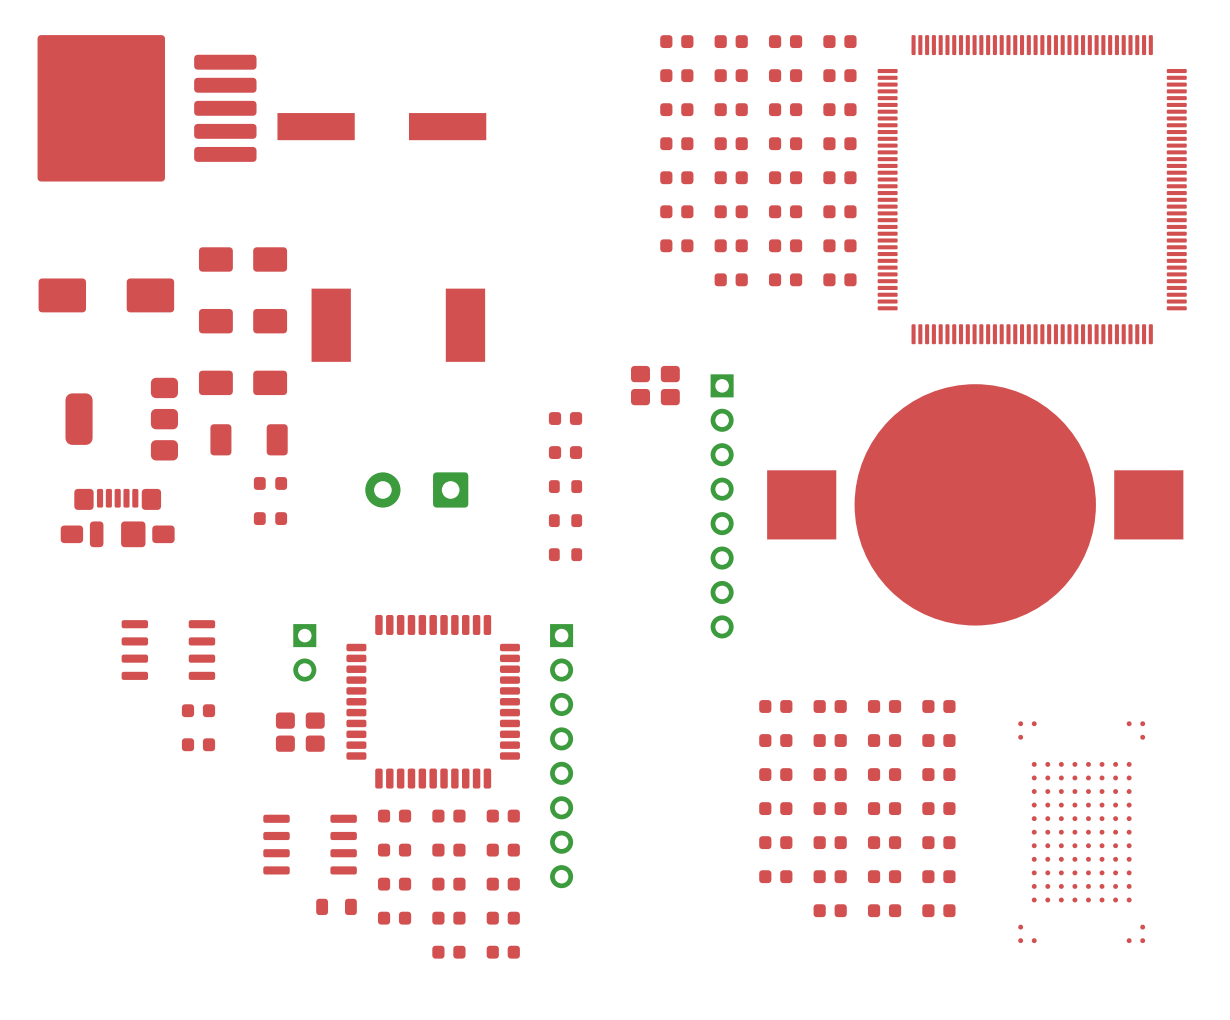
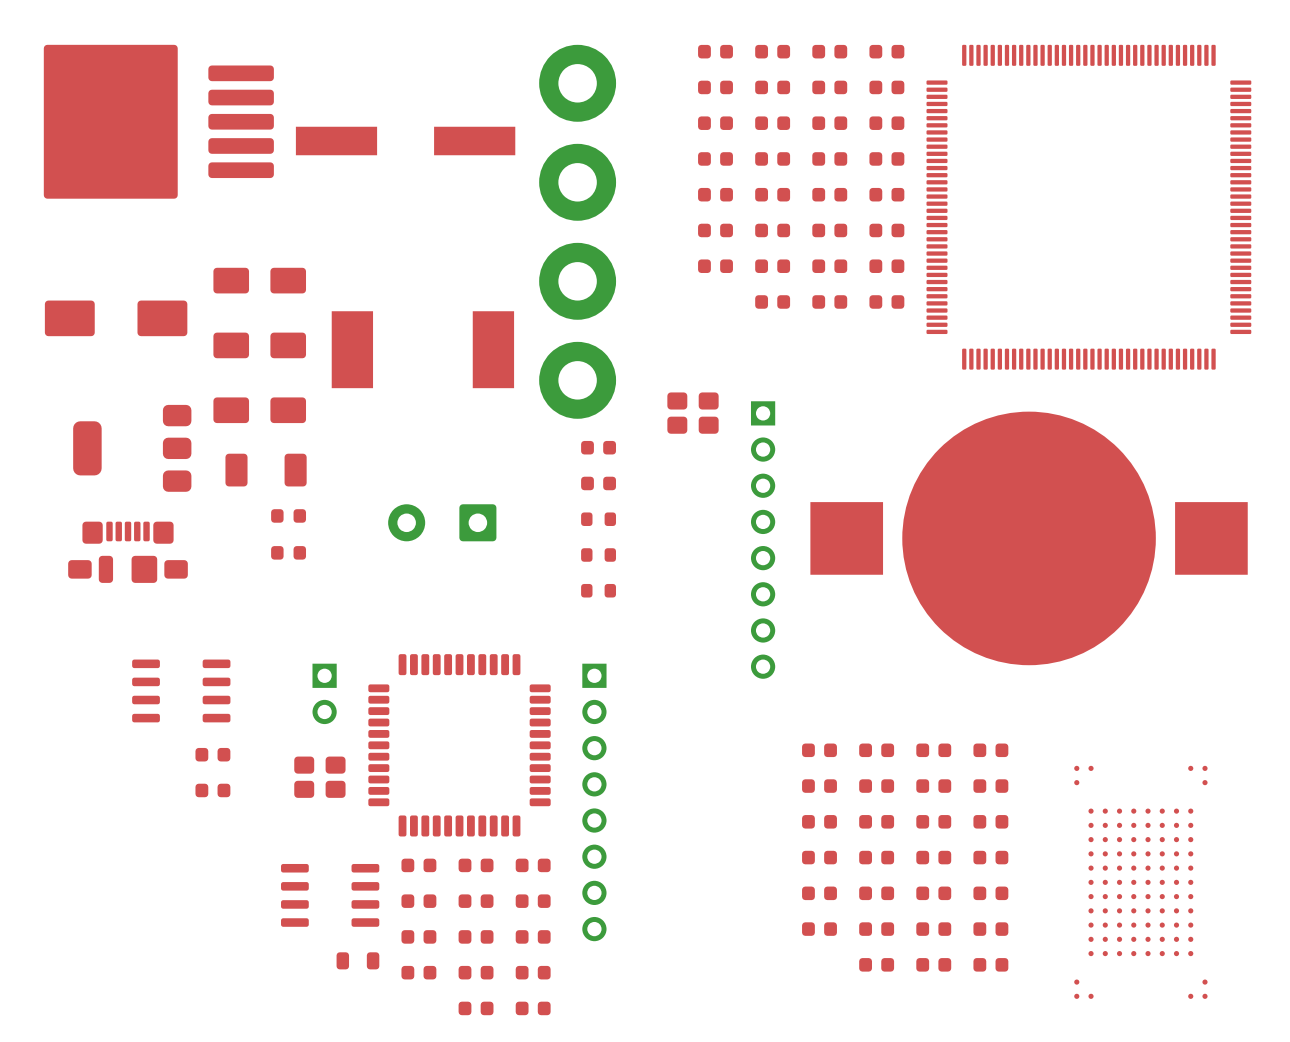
part: none -> (577, 83)
part: none -> (577, 182)
part: none -> (577, 281)
part: none -> (577, 380)

